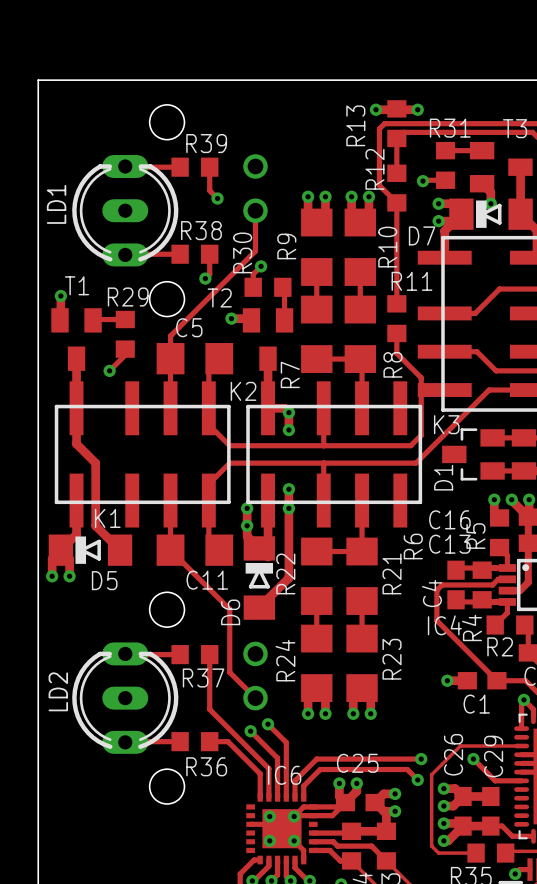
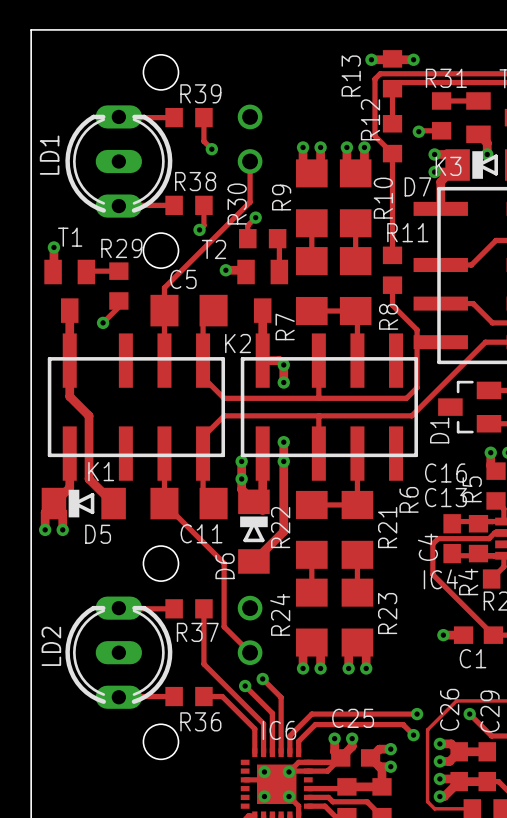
K3 name position: K3 (446, 424) -> K3 (448, 166)

